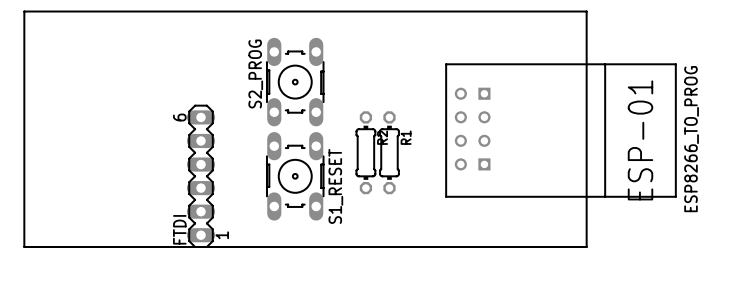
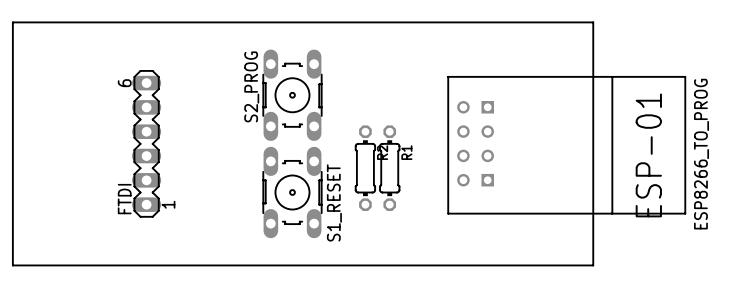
FTDI position: (201, 176) -> (146, 143)

